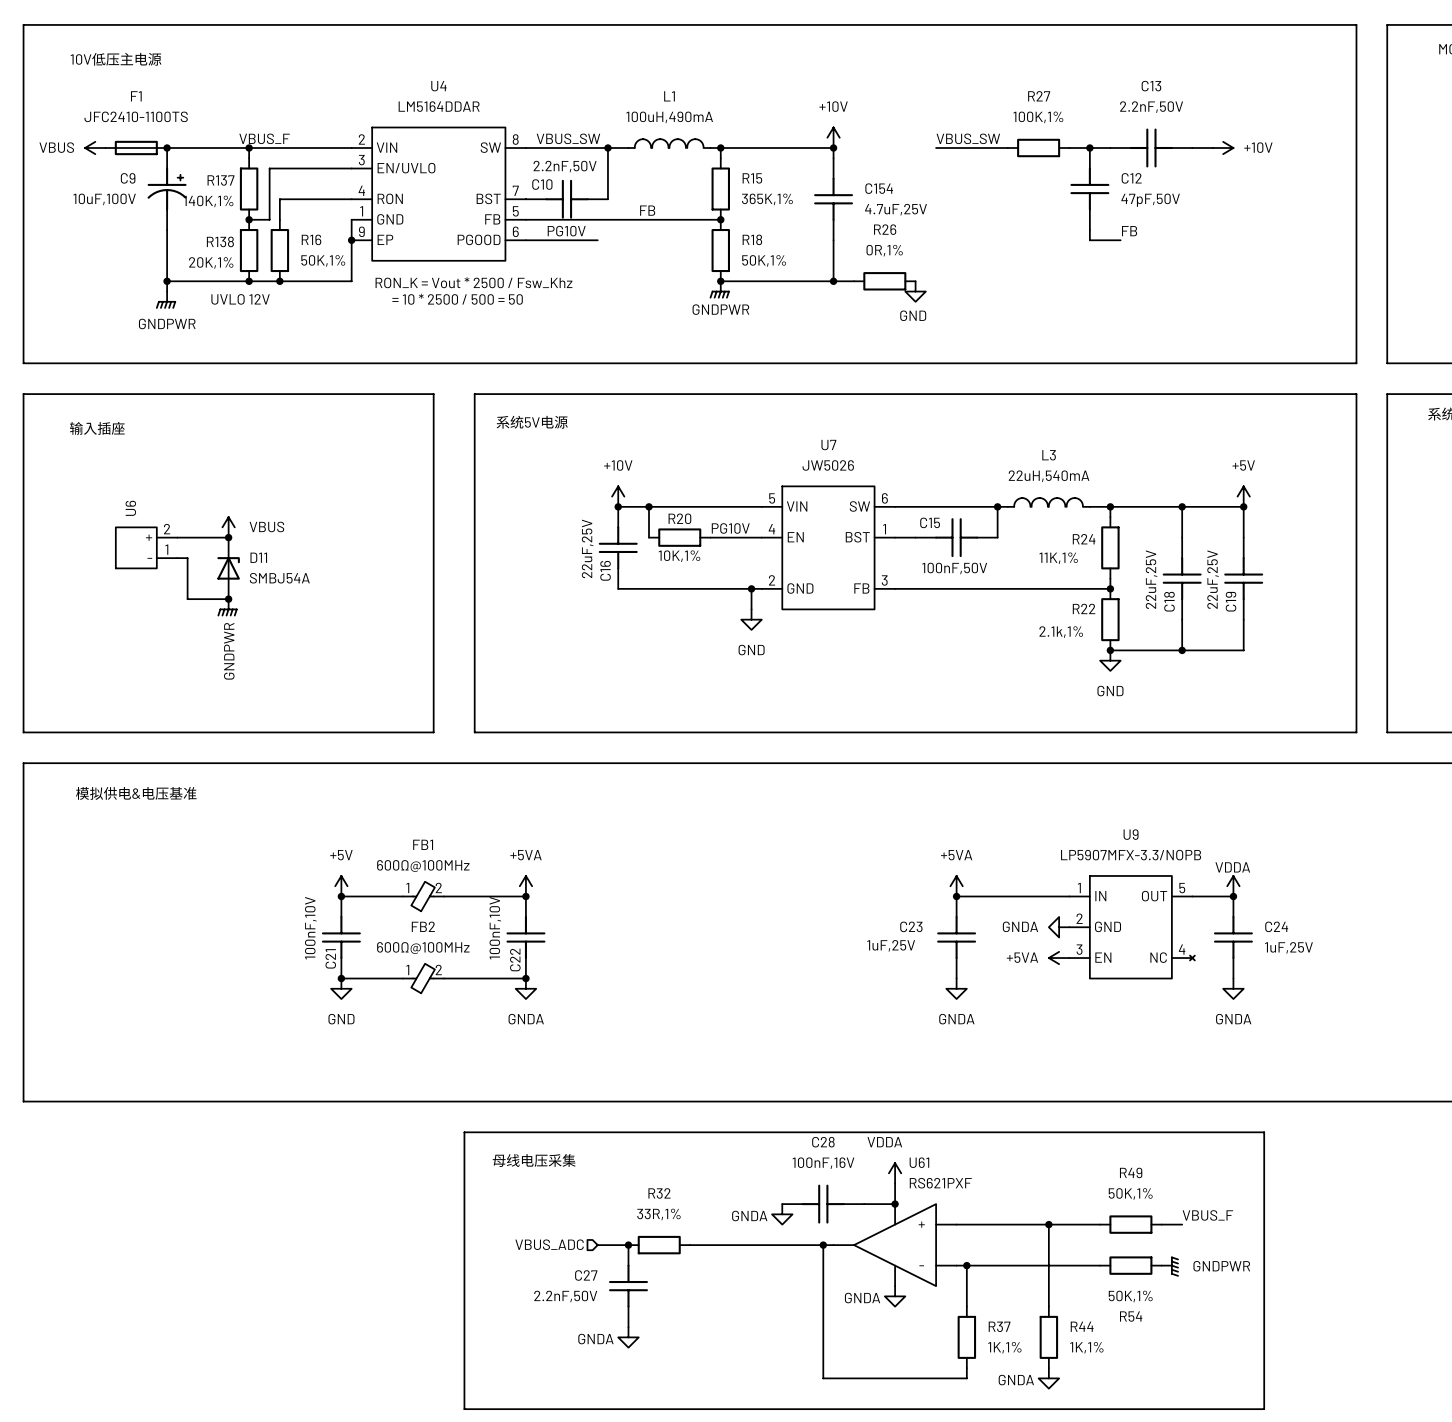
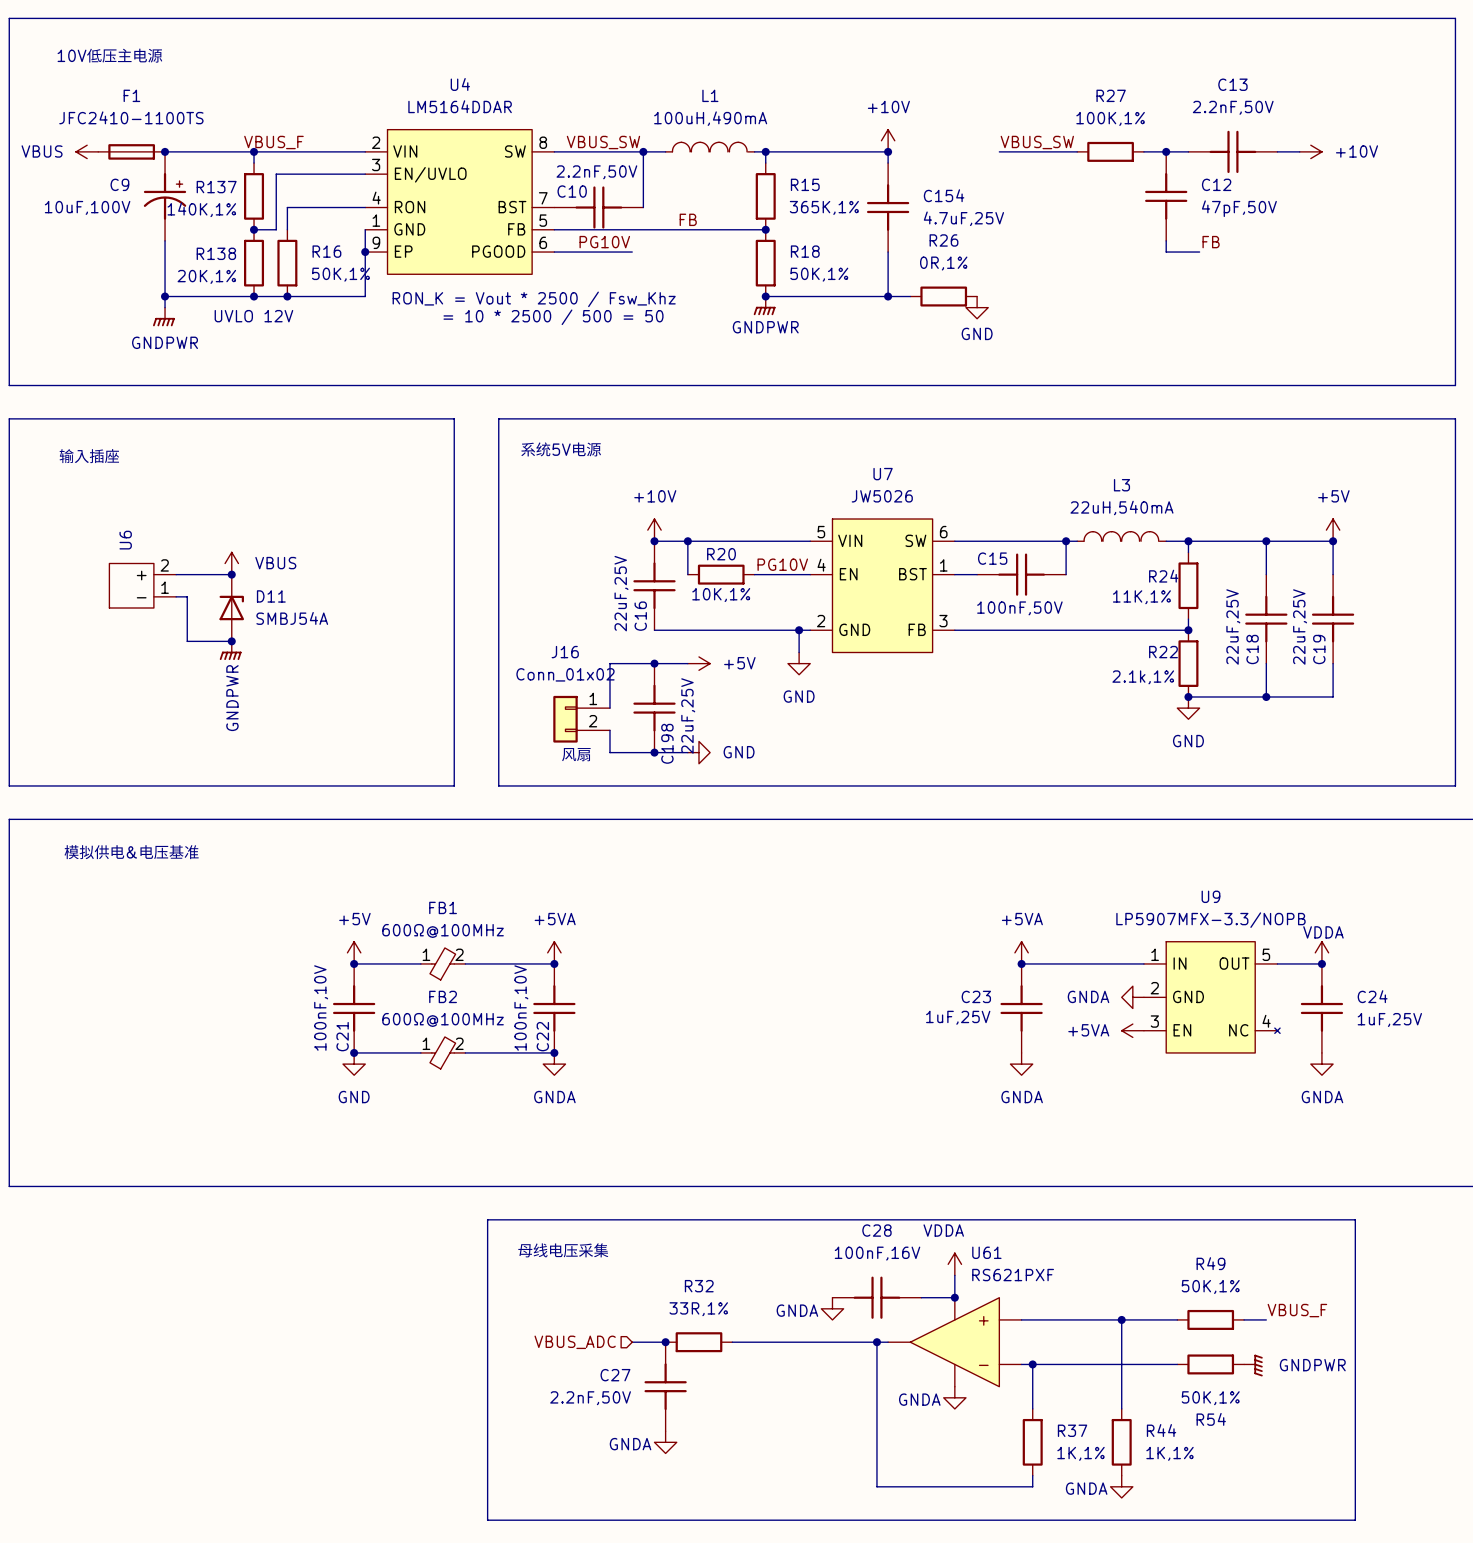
junction: none -> (654, 663)
wire: none -> (687, 663) (609, 663) (609, 708)
power symbol: none -> +5V (698, 663)
C198: none -> 22uF,25V (654, 708)
J16: none -> Conn_01x02 (581, 719)
wire: none -> (609, 730) (609, 752) (687, 752)
junction: none -> (654, 752)
power symbol: none -> GND (698, 752)
text: none -> 风扇 (576, 754)

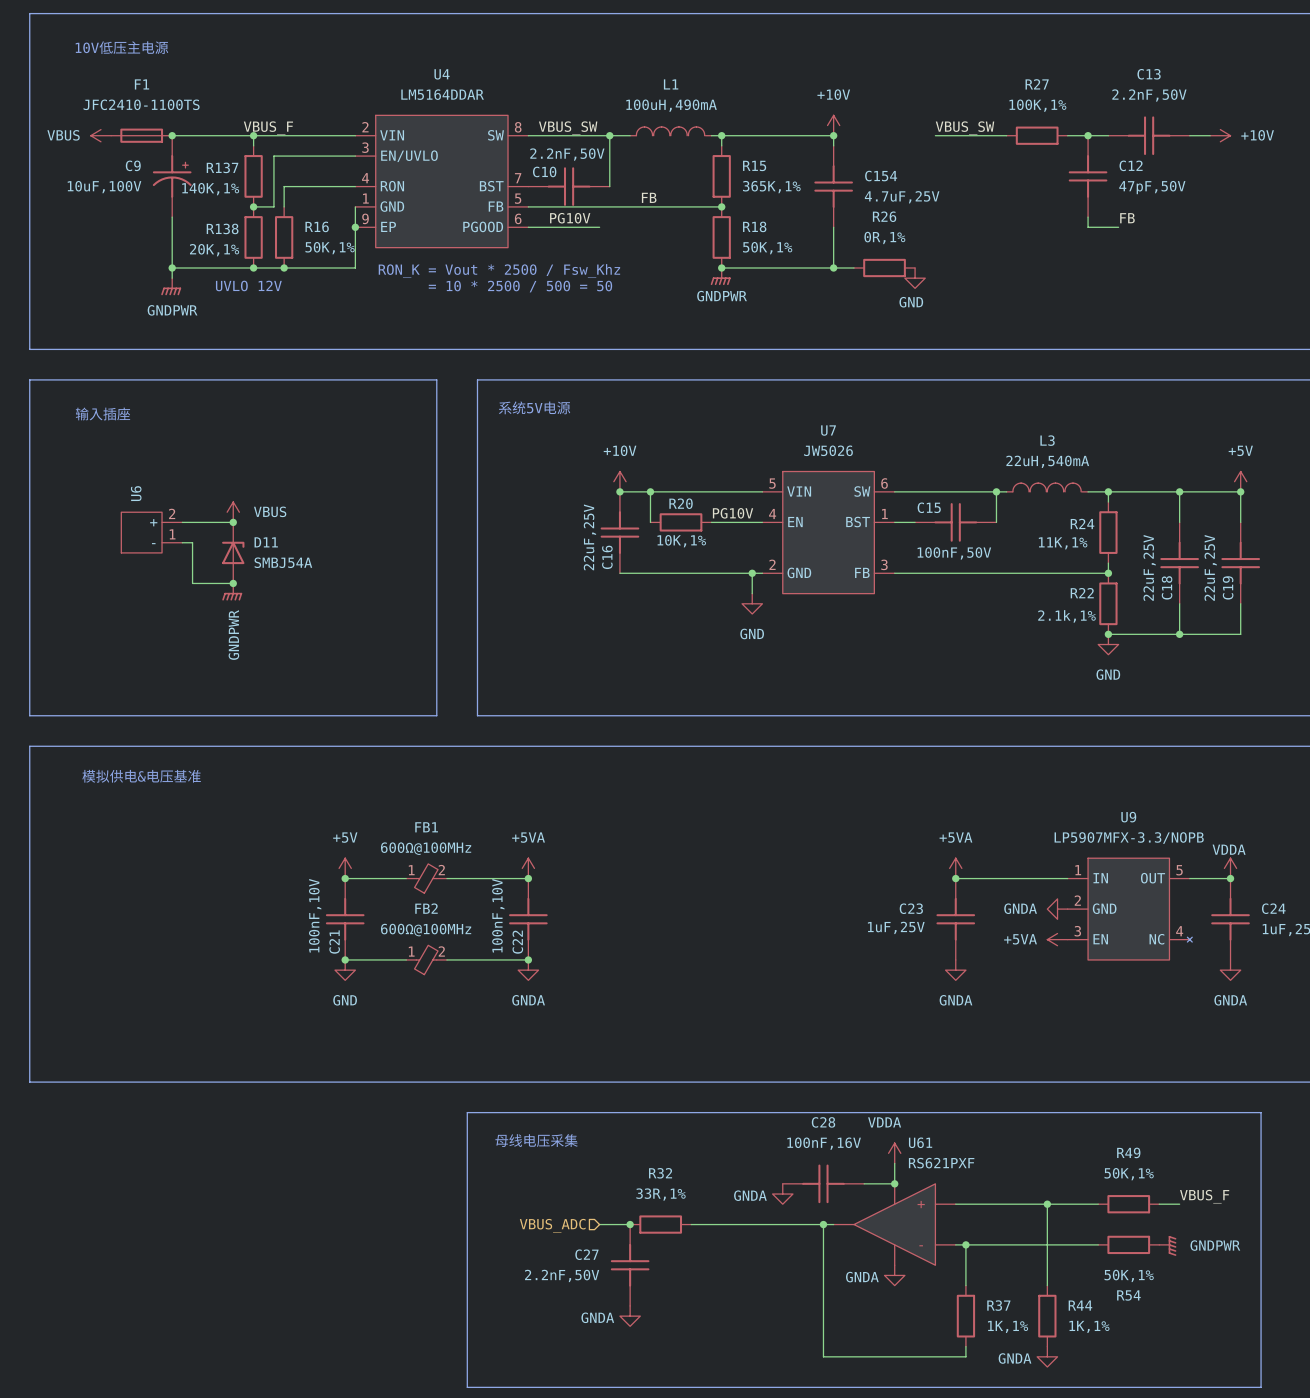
junction: (654, 663) -> none
wire: (687, 663) (609, 663) (609, 708) -> none
power symbol: +5V (698, 663) -> none
C198: 22uF,25V (654, 708) -> none
J16: Conn_01x02 (581, 719) -> none
wire: (609, 730) (609, 752) (687, 752) -> none
junction: (654, 752) -> none
power symbol: GND (698, 752) -> none
text: 风扇 (576, 754) -> none

